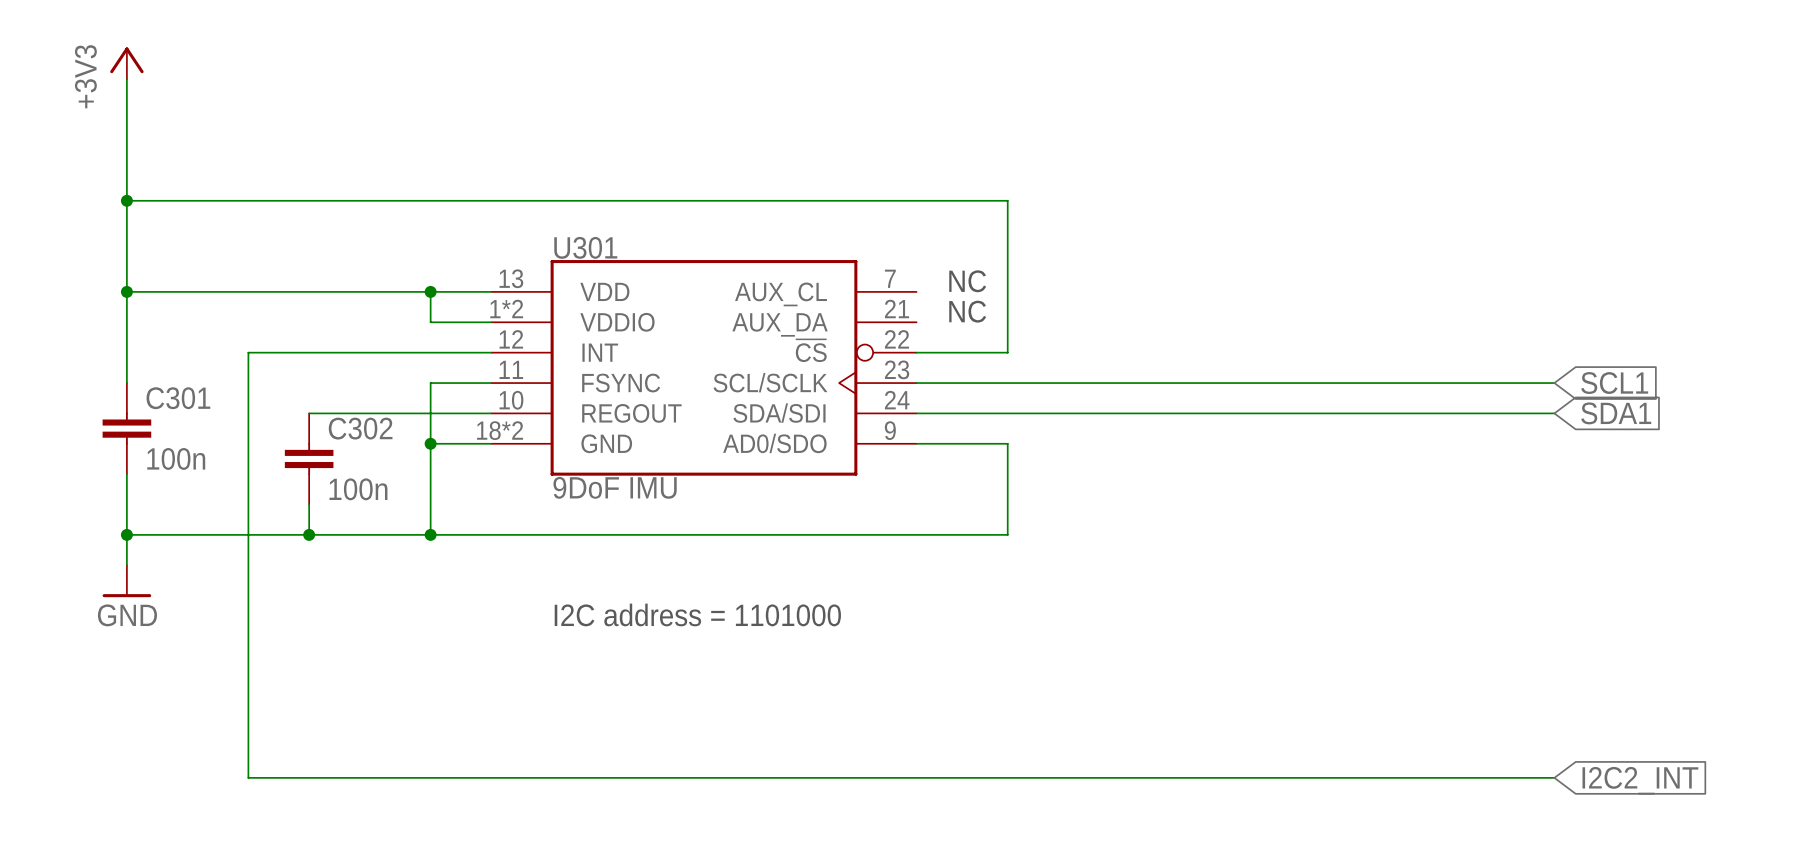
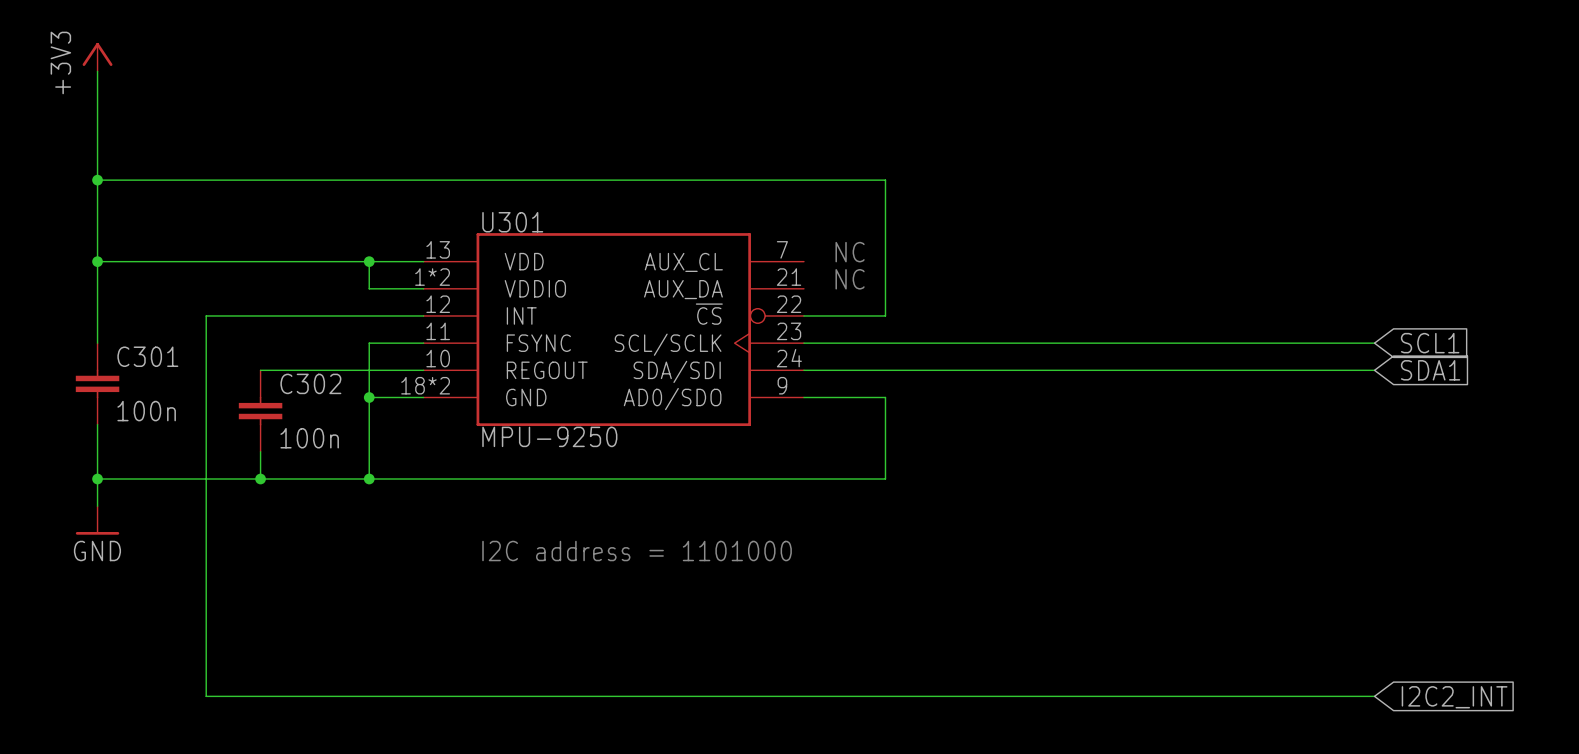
U301 value: 9DoF IMU (615, 487) -> MPU-9250 (549, 436)

